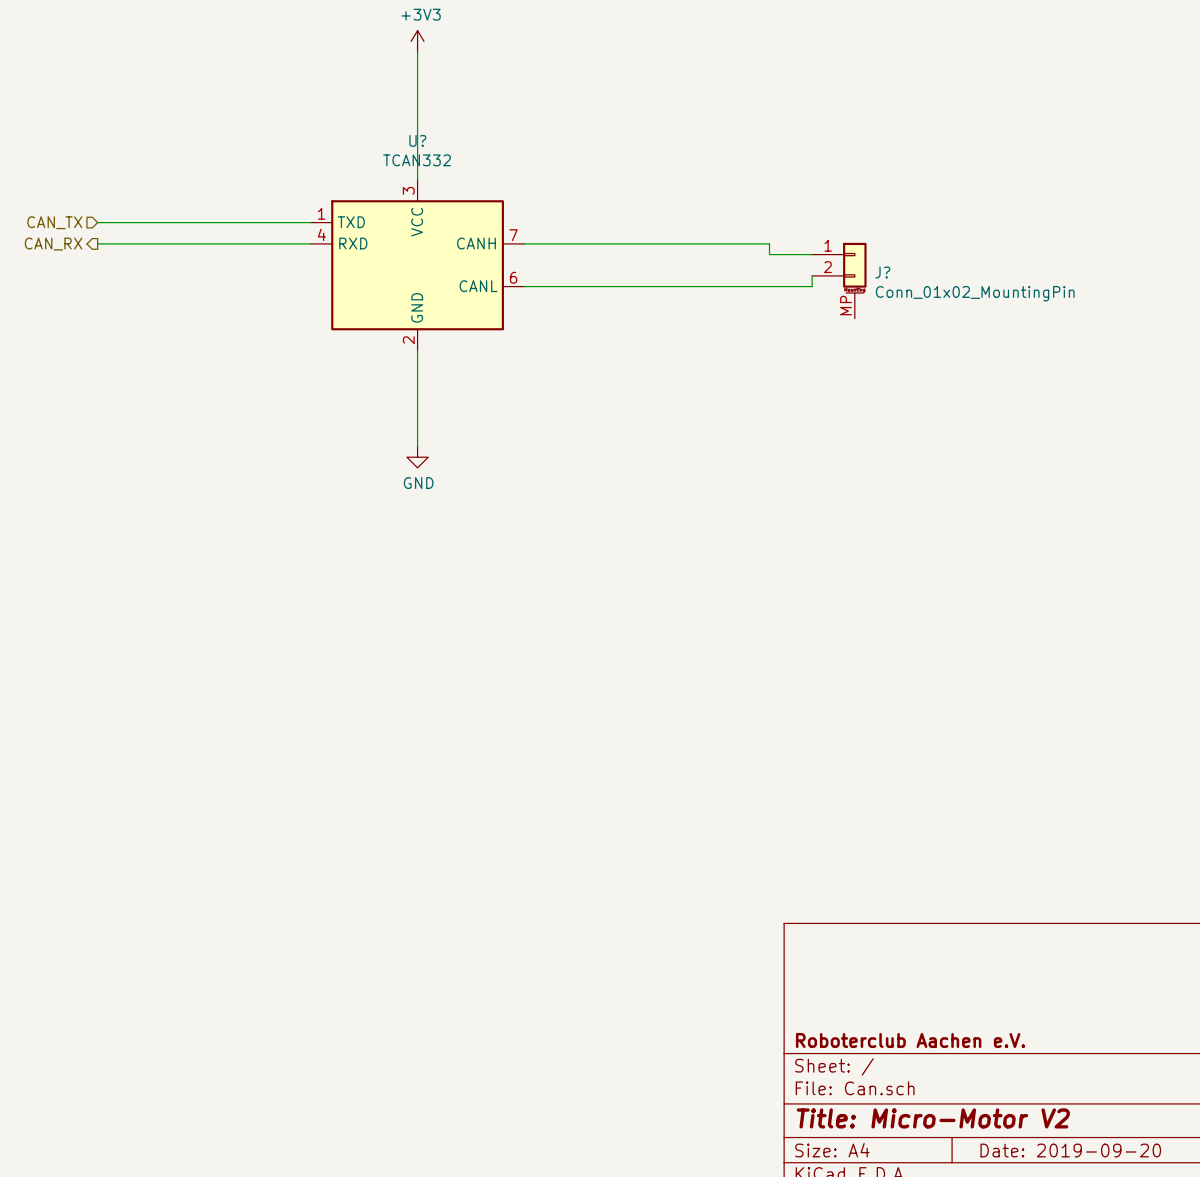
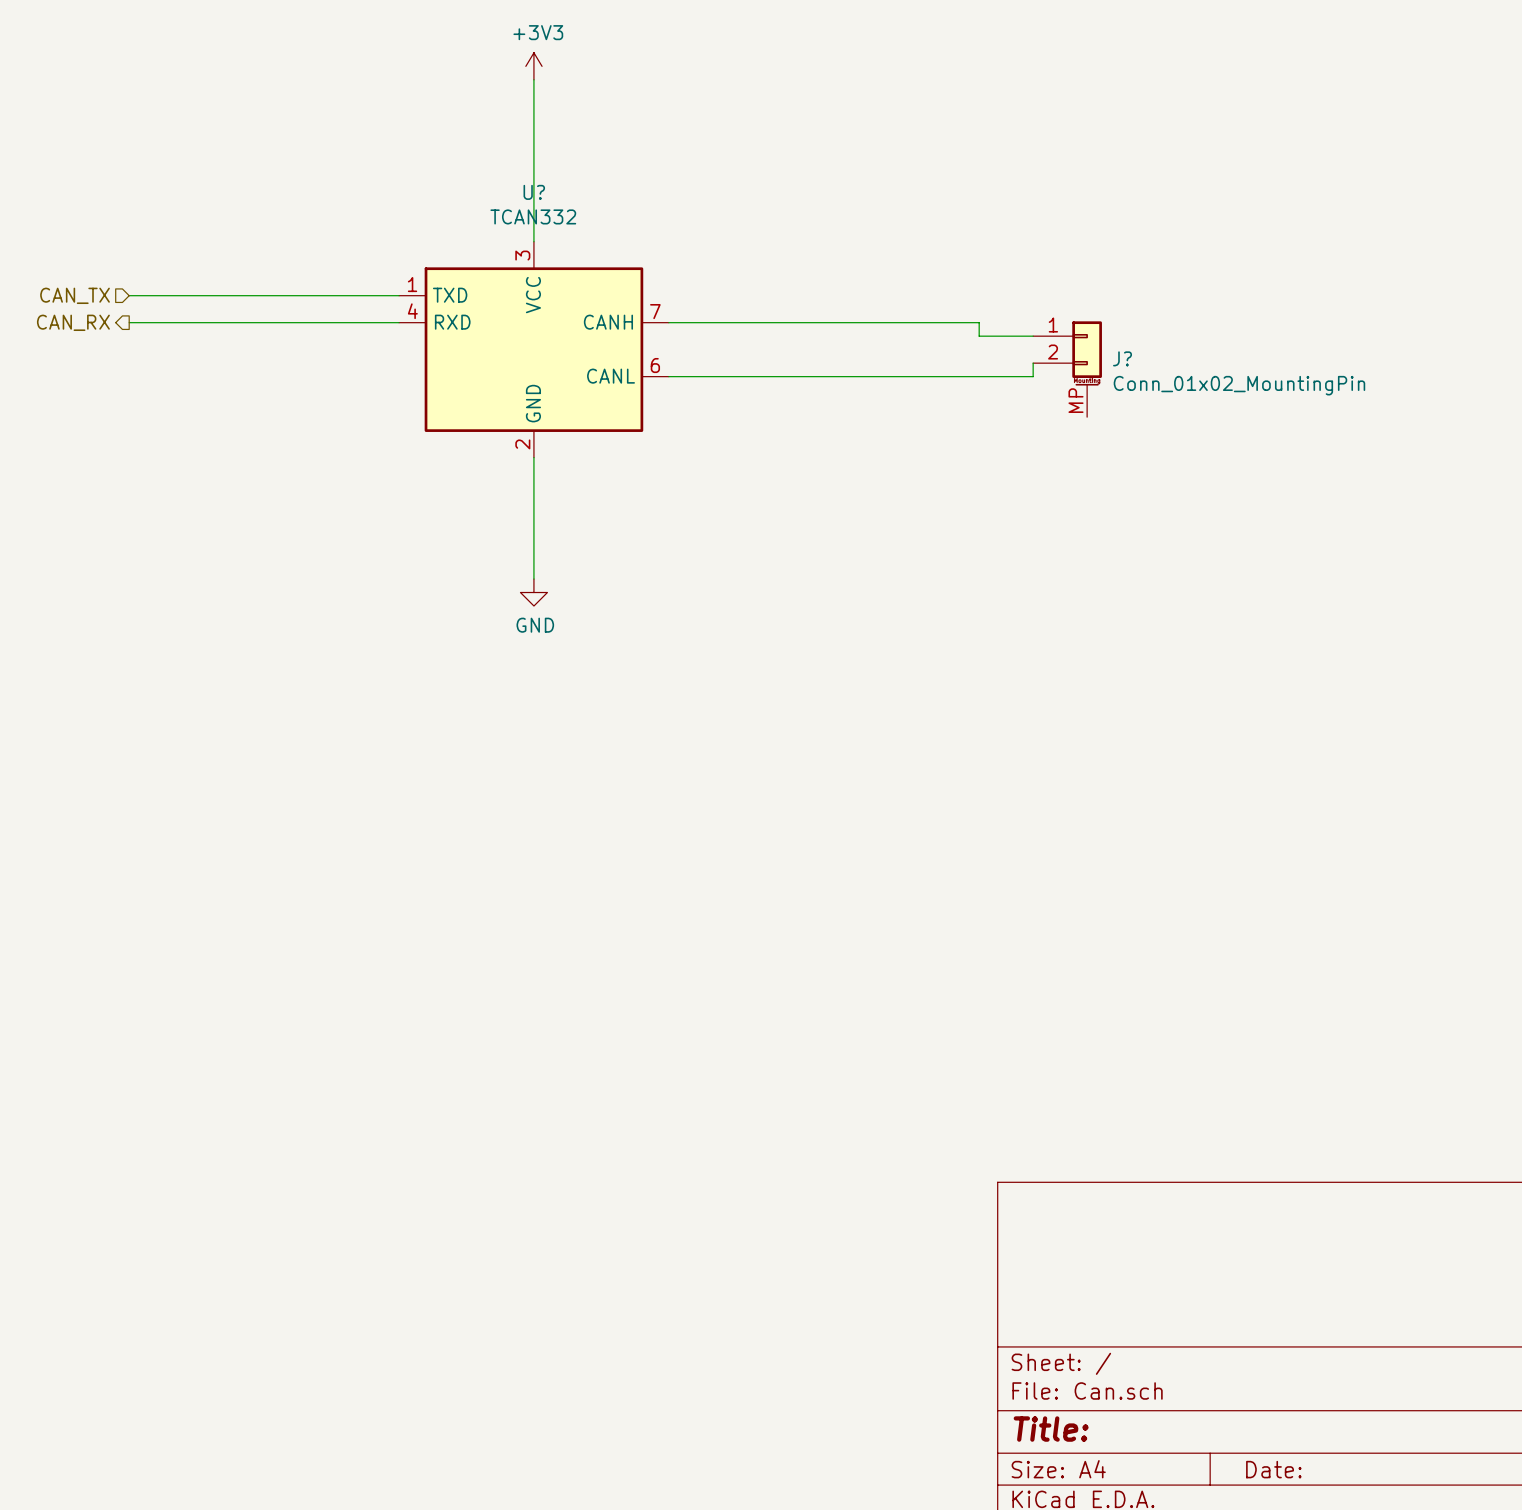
title block: Roboterclub Aachen e.V. (910, 1040) -> none
title block: Title: Micro-Motor V2 (933, 1118) -> Title: (1051, 1429)
title block: Date: 2019-09-20 (1070, 1150) -> Date: (1273, 1469)

